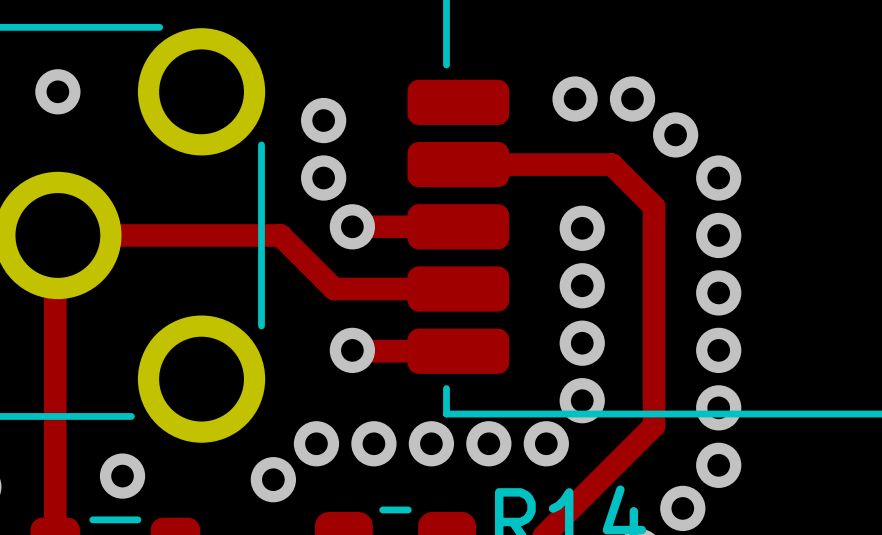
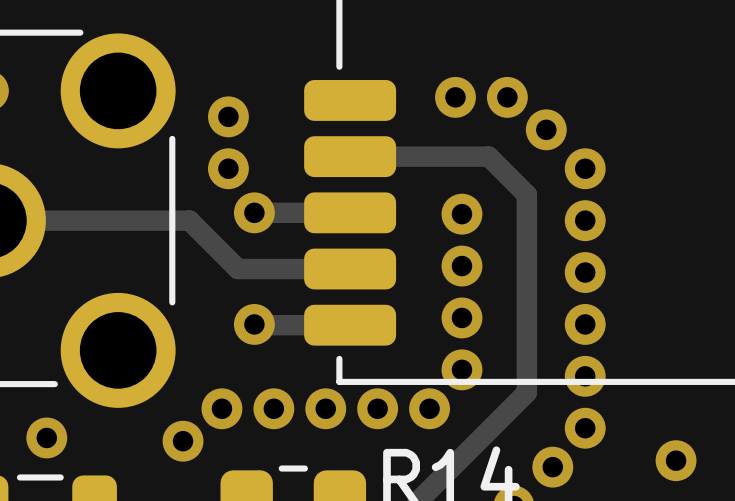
via: none -> (676, 460)

